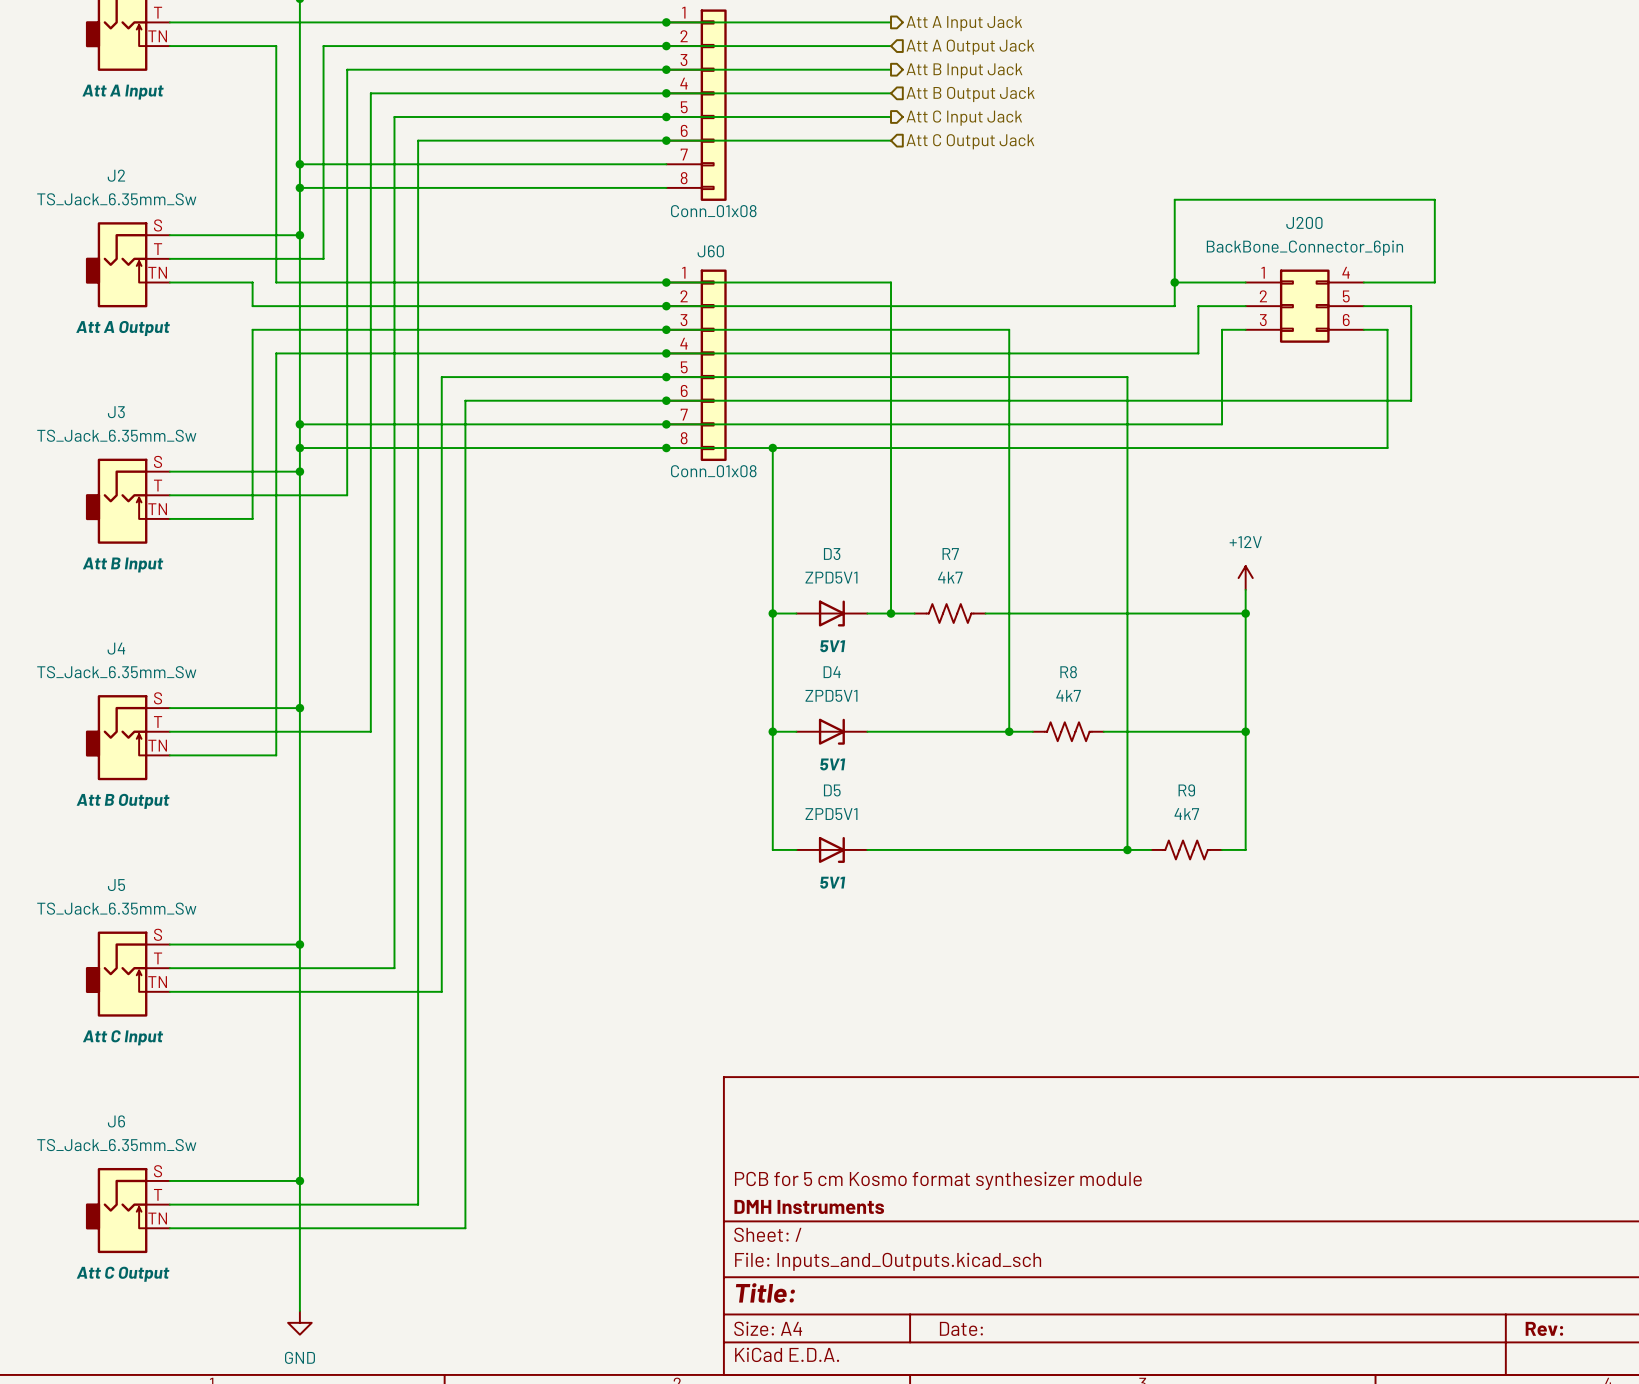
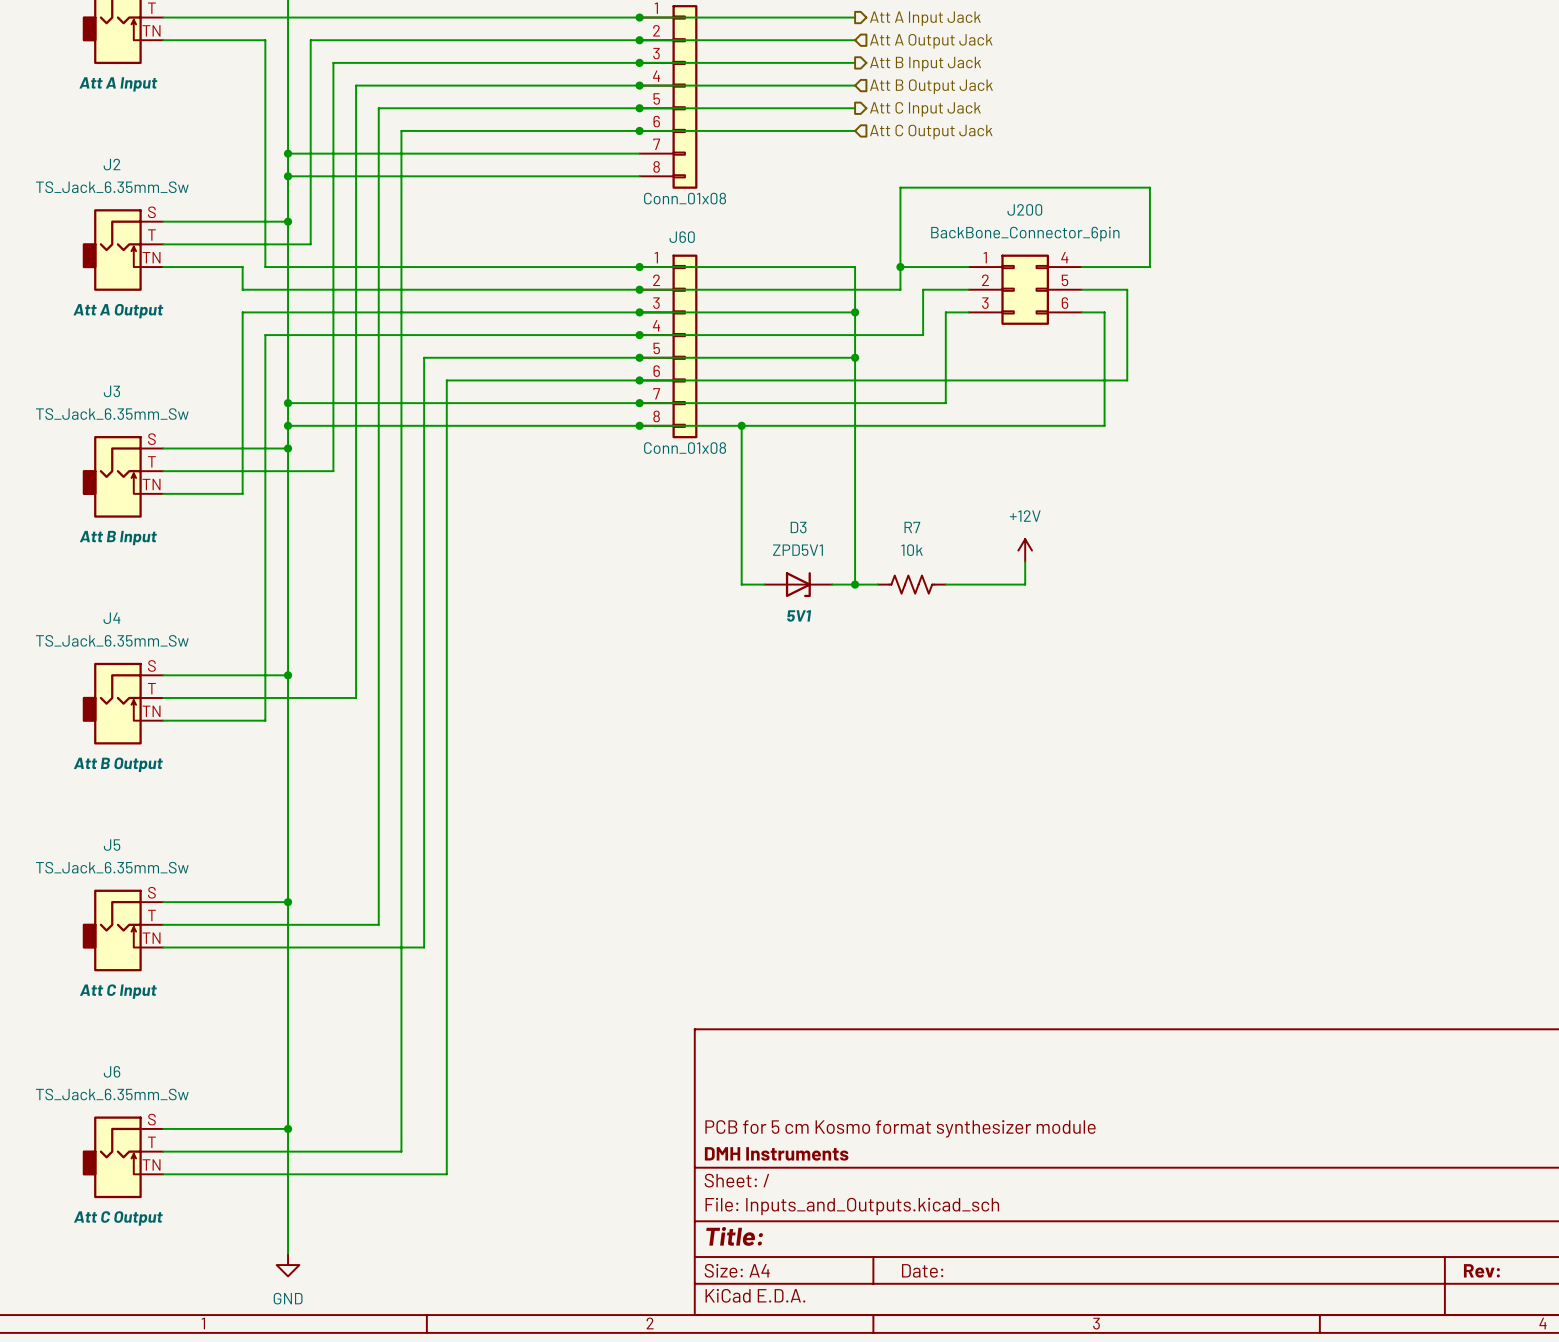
wire: (1174, 199) (1174, 306) -> (1127, 187) (900, 187) (900, 289)
wire: (1198, 199) (1434, 199) (1434, 282) (1363, 282) -> none
wire: none -> (900, 267) (968, 267)
junction: none -> (900, 267)
wire: none -> (1081, 267) (1127, 267)
junction: (1174, 282) -> none
wire: (1198, 282) (1245, 282) -> (1149, 267) (1149, 187)
wire: (938, 306) (961, 306) -> (923, 335) (923, 289)
wire: (1245, 306) (1198, 306) (1198, 353) (961, 353) -> none
J200 position: (1304, 306) -> (1025, 289)
wire: (1363, 306) (1411, 306) (1411, 400) (1174, 400) -> (1127, 289) (1127, 380)
wire: (891, 329) (985, 329) -> (945, 403) (945, 312)
junction: none -> (855, 312)
wire: (1009, 329) (1009, 731) -> none
wire: (1245, 329) (1222, 329) (1222, 424) (985, 424) -> none
wire: (1363, 329) (1387, 329) (1387, 448) (1151, 448) -> (1081, 312) (1104, 312) (1104, 425)
wire: (891, 377) (1127, 377) (1127, 849) -> none
junction: none -> (855, 357)
R7 value: 4k7 (950, 577) -> 10k (912, 550)
power symbol position: +12V (1245, 578) -> +12V (1025, 550)
wire: (1245, 589) (1245, 849) (1222, 849) -> none
wire: (772, 613) (772, 849) (796, 849) -> none
junction: (772, 613) -> none
wire: (1068, 613) (1245, 613) -> (1025, 584) (1025, 561)
junction: (1245, 613) -> none
wire: (772, 731) (796, 731) -> none
junction: (772, 731) -> none
D4: ZPD5V1 (831, 731) -> none
wire: (867, 731) (1032, 731) -> none
junction: (1009, 731) -> none
R8: 4k7 (1068, 731) -> none
wire: (1103, 731) (1245, 731) -> none
junction: (1245, 731) -> none
D5: ZPD5V1 (831, 849) -> none
wire: (867, 849) (1151, 849) -> none
junction: (1127, 849) -> none
R9: 4k7 (1186, 849) -> none

